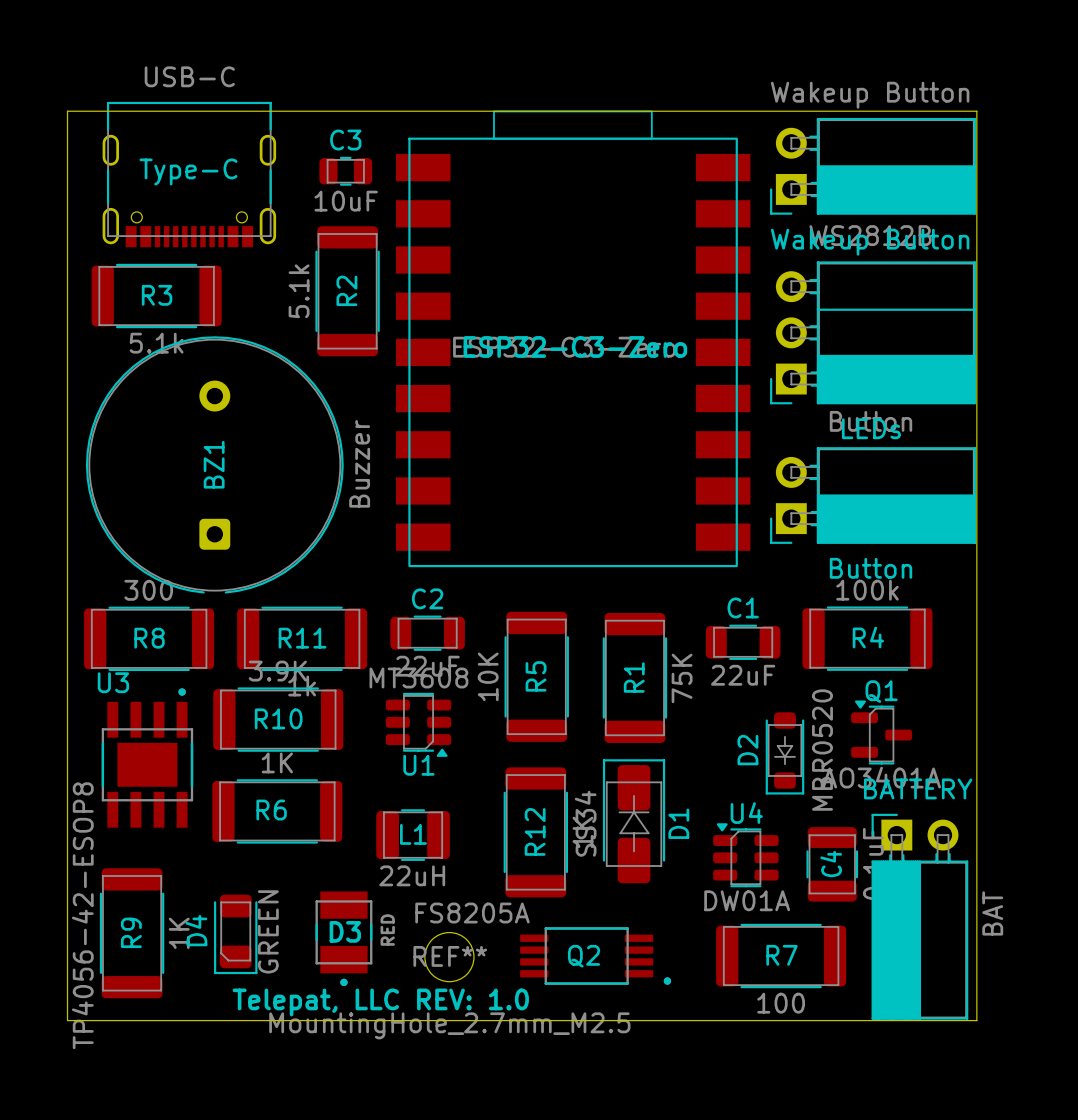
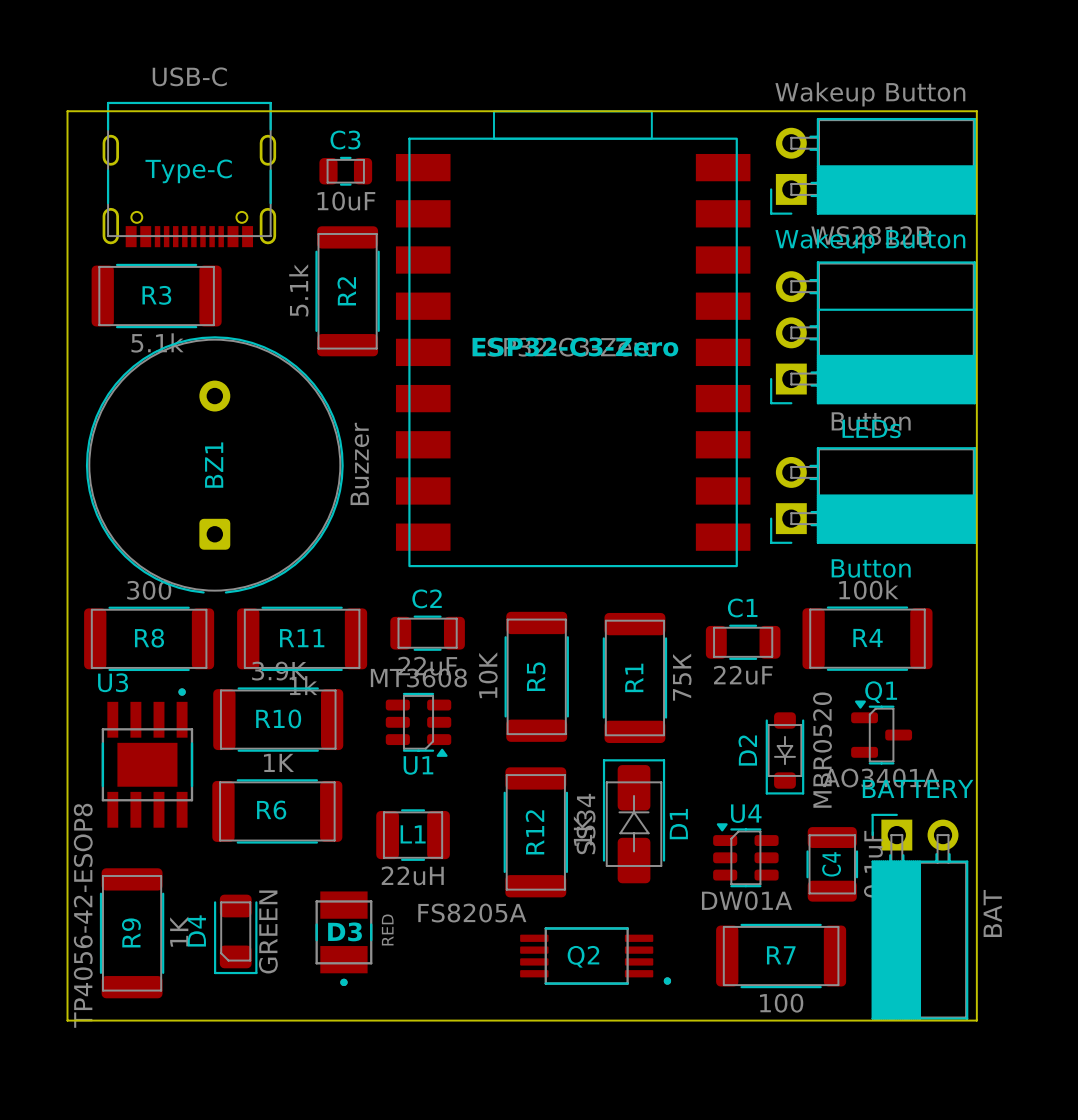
REF**: MountingHole_2.7mm_M2.5 (449, 957) -> none
text: Telepat, LLC REV: 1.0 (380, 1002) -> none

